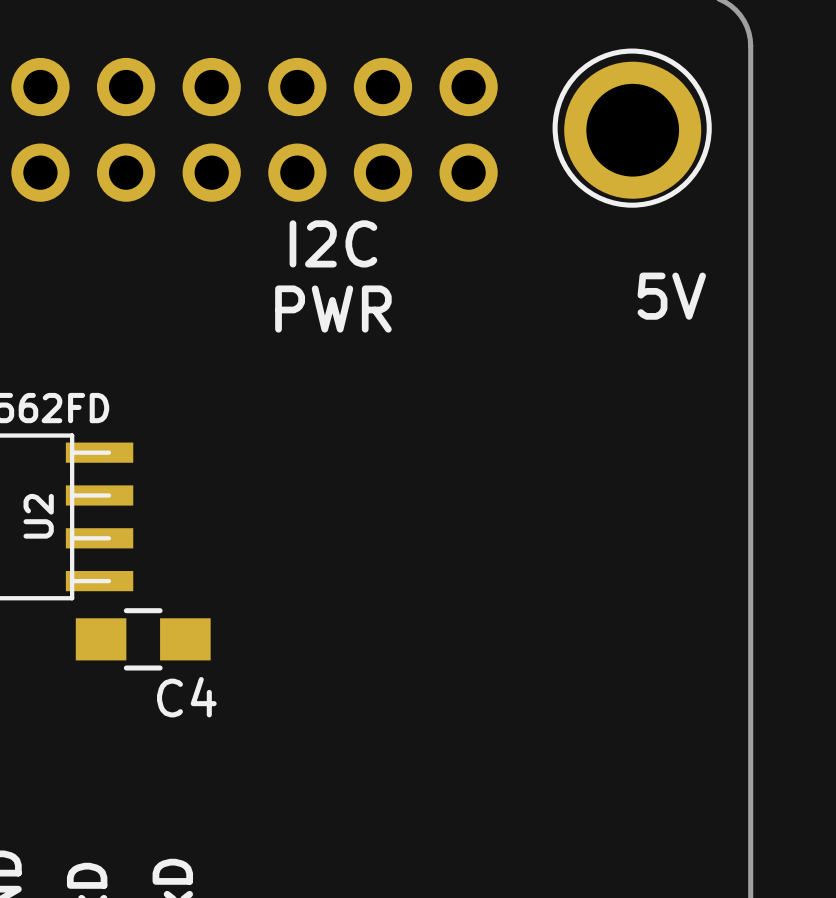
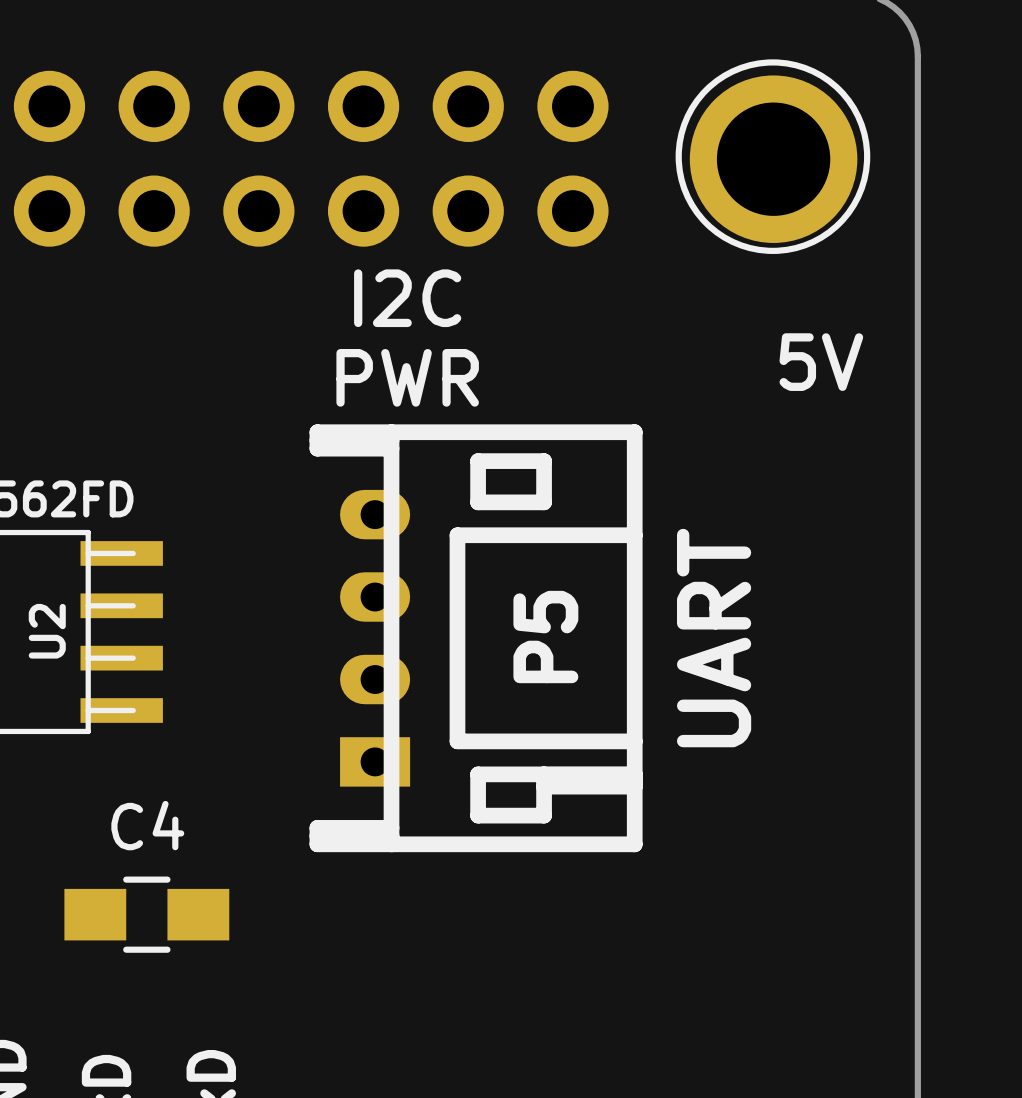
text: none -> UART (714, 638)
P5: none -> (476, 638)
C4 position: (143, 639) -> (146, 914)
C4 name position: C4 (186, 697) -> C4 (147, 825)

